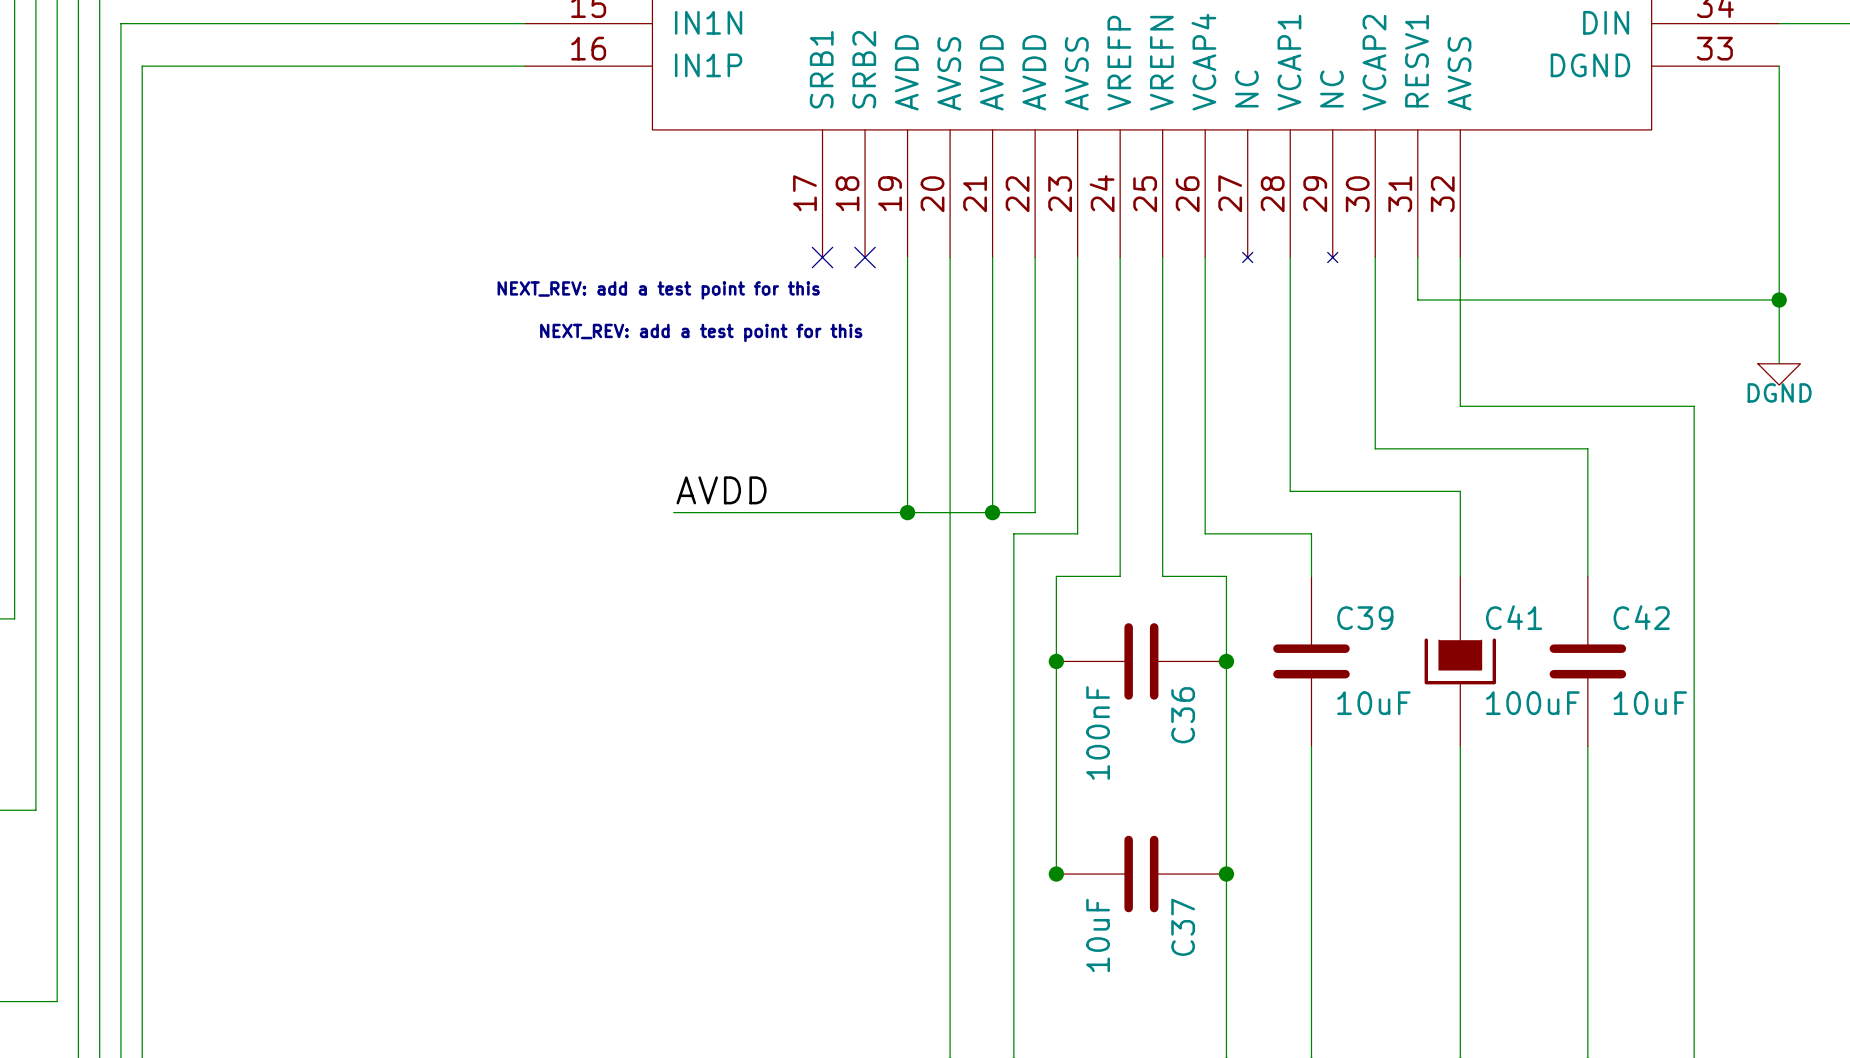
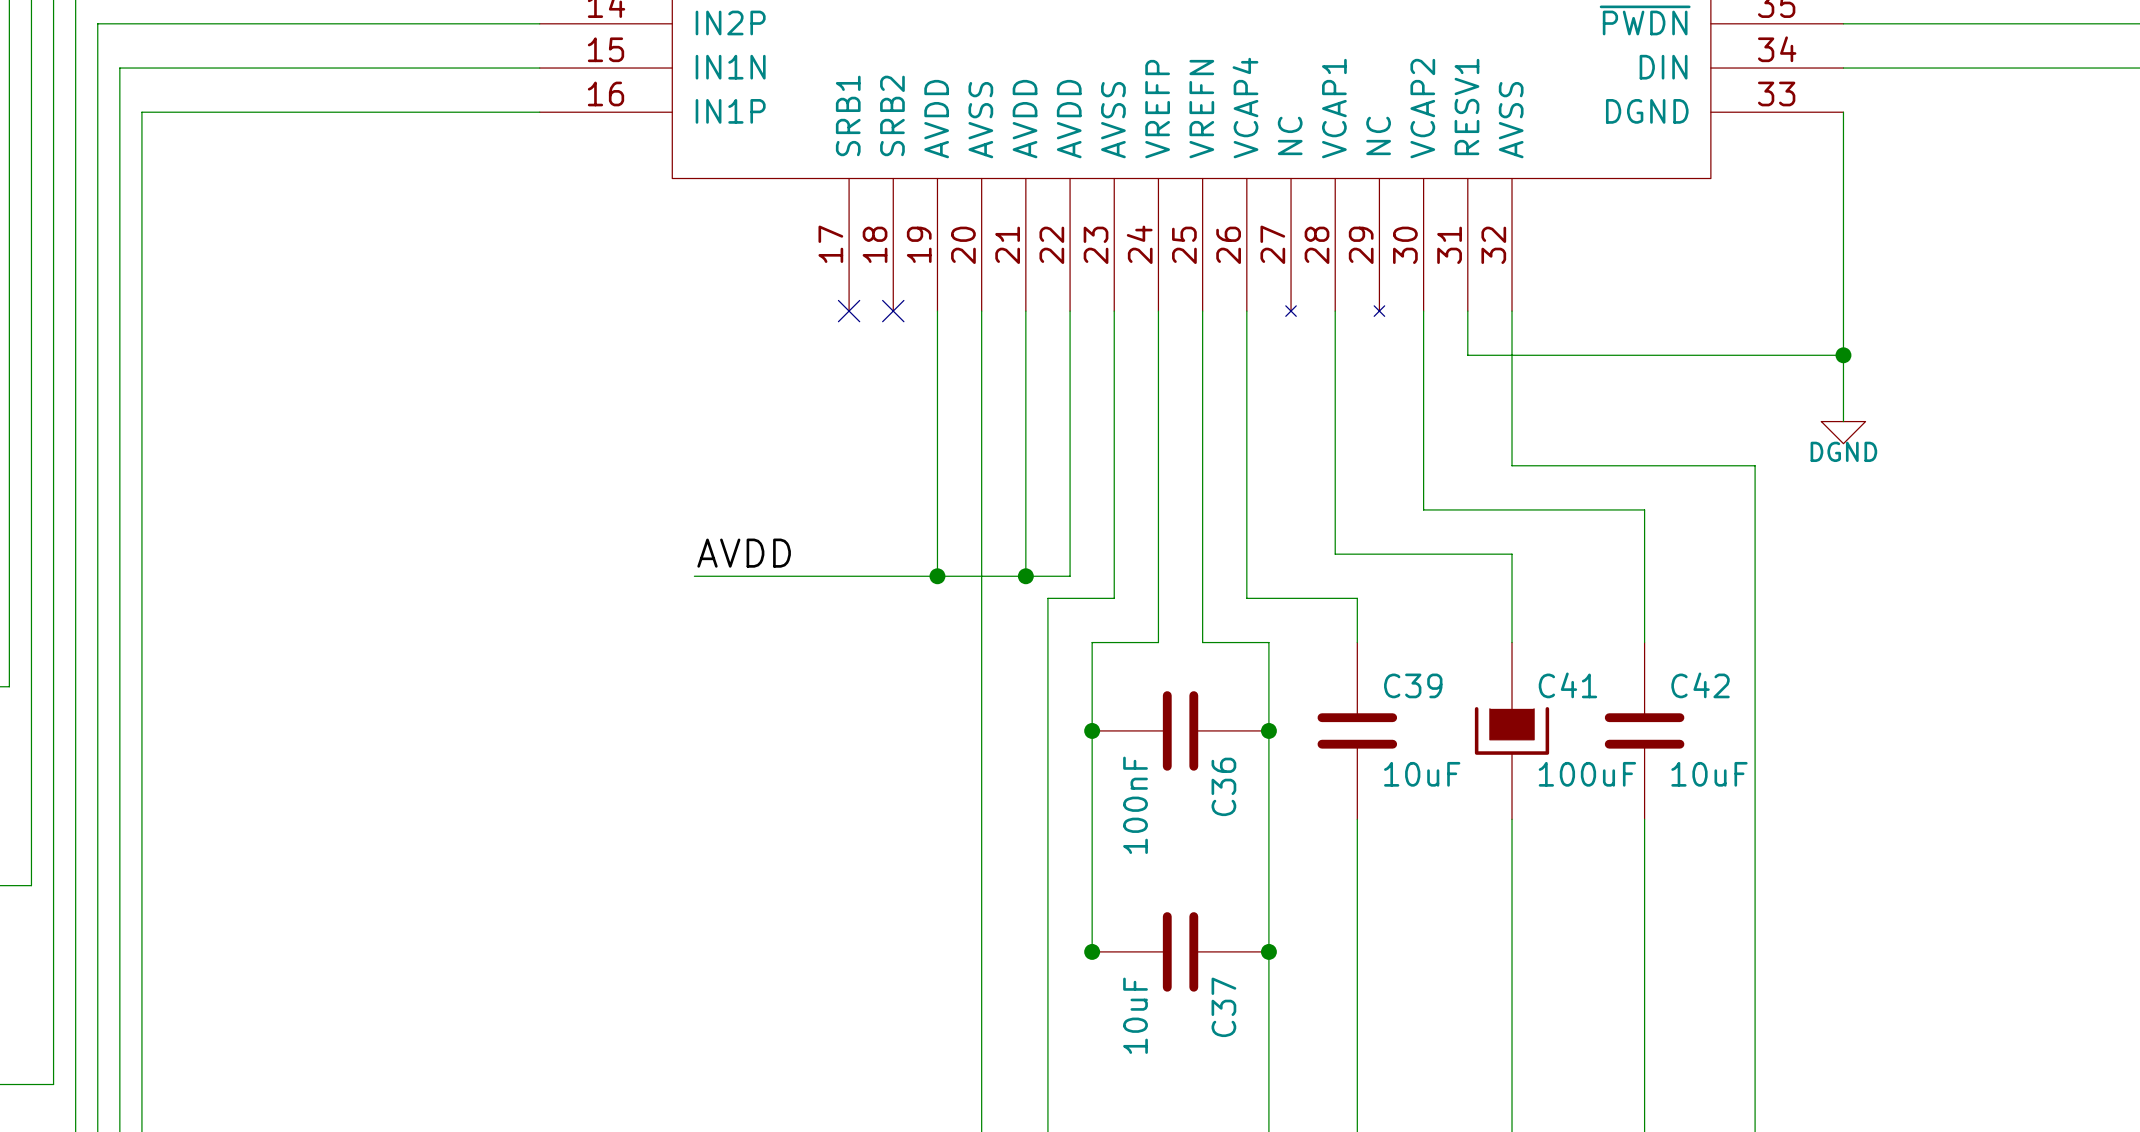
text: NEXT_REV: add a test point for this (658, 290) -> none
text: NEXT_REV: add a test point for this (701, 332) -> none

